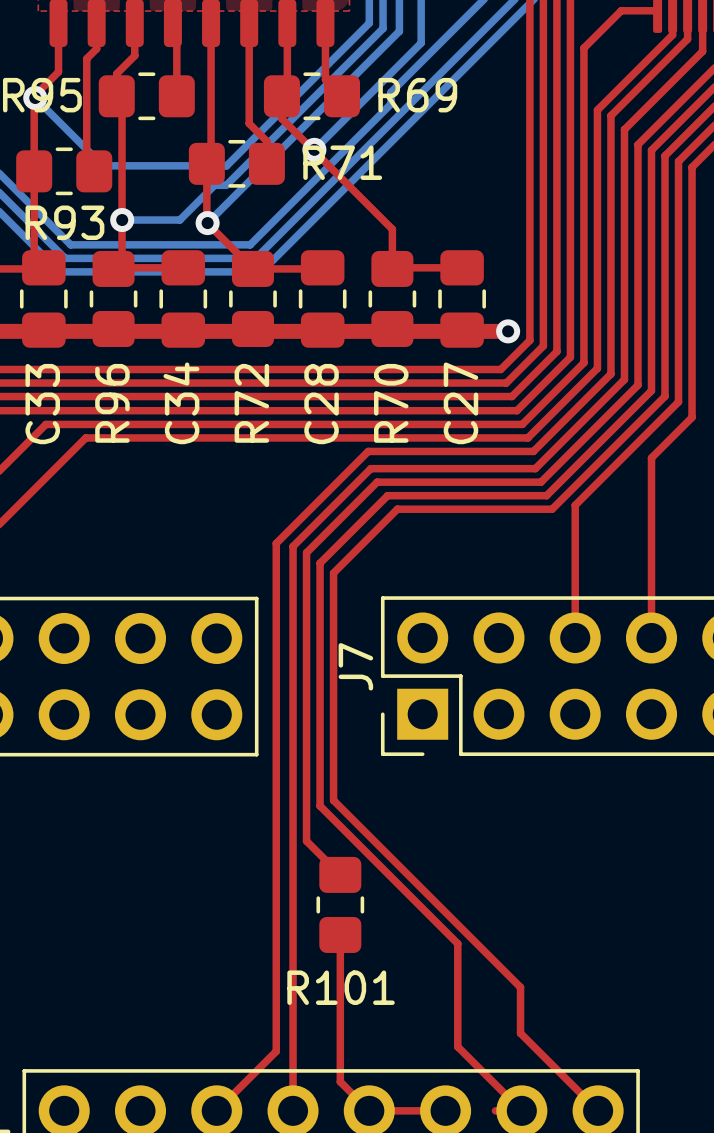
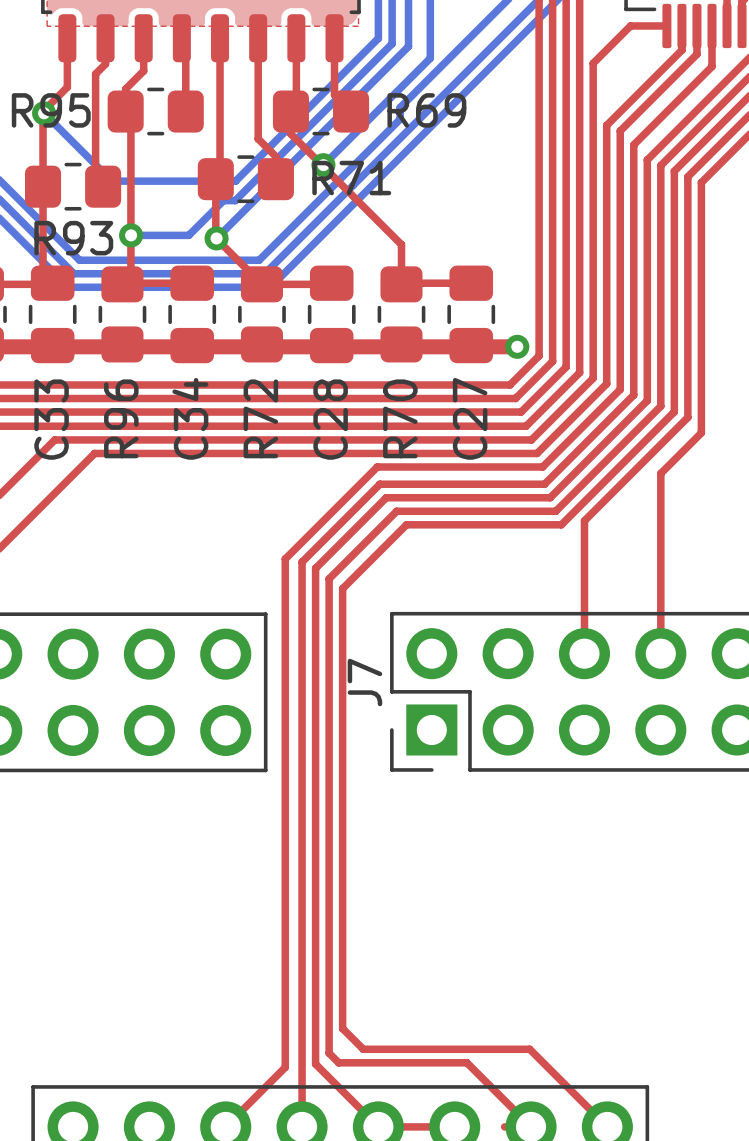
top track: (333, 800) (520, 987) (520, 1033) -> (342, 816) (342, 1028) (363, 1049) (529, 1049)
top track: (320, 805) (457, 943) (457, 1046) -> (329, 821) (329, 1053) (338, 1062) (466, 1062)
top track: (306, 841) (340, 874) -> none
R101: (340, 904) -> none
top track: (340, 934) (340, 1081) -> (315, 856) (315, 1064) (349, 1097)

